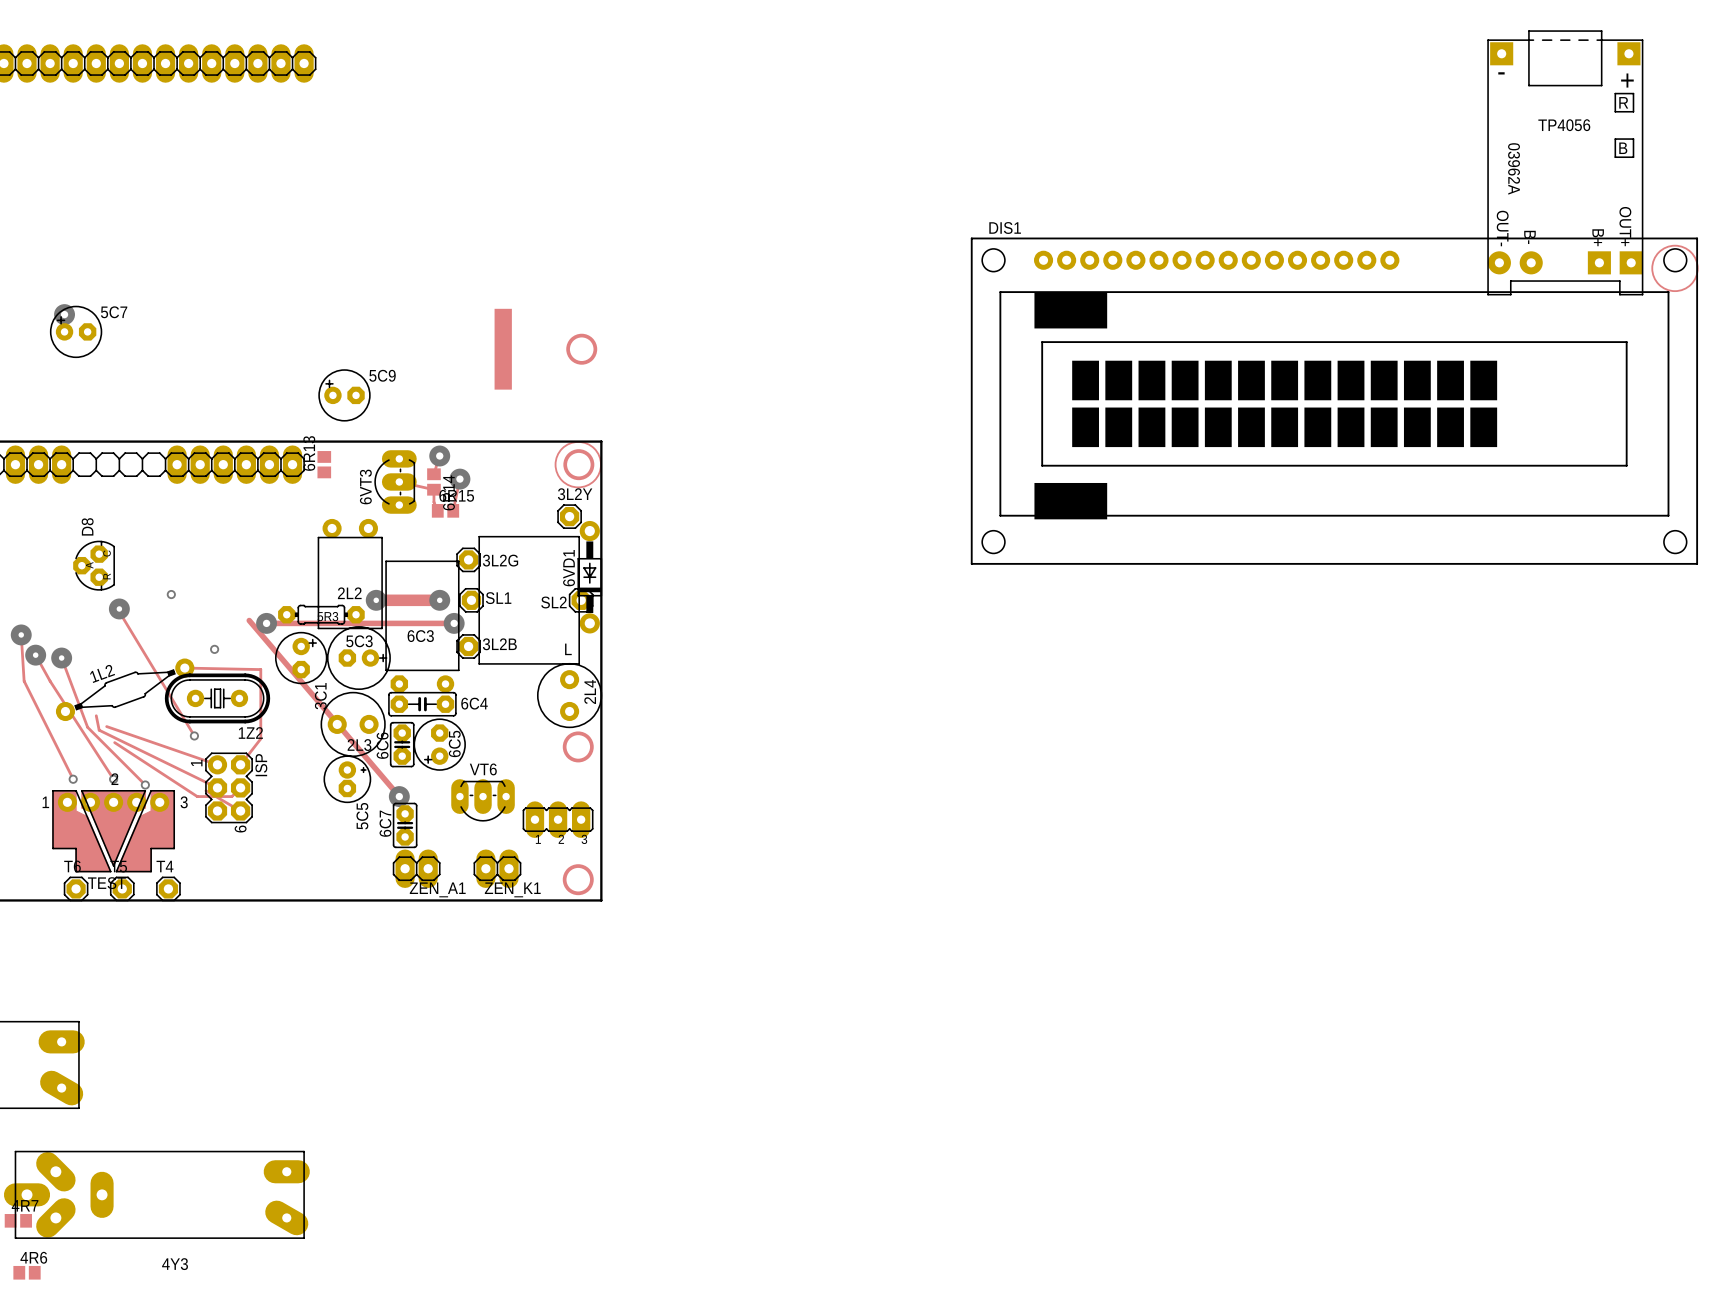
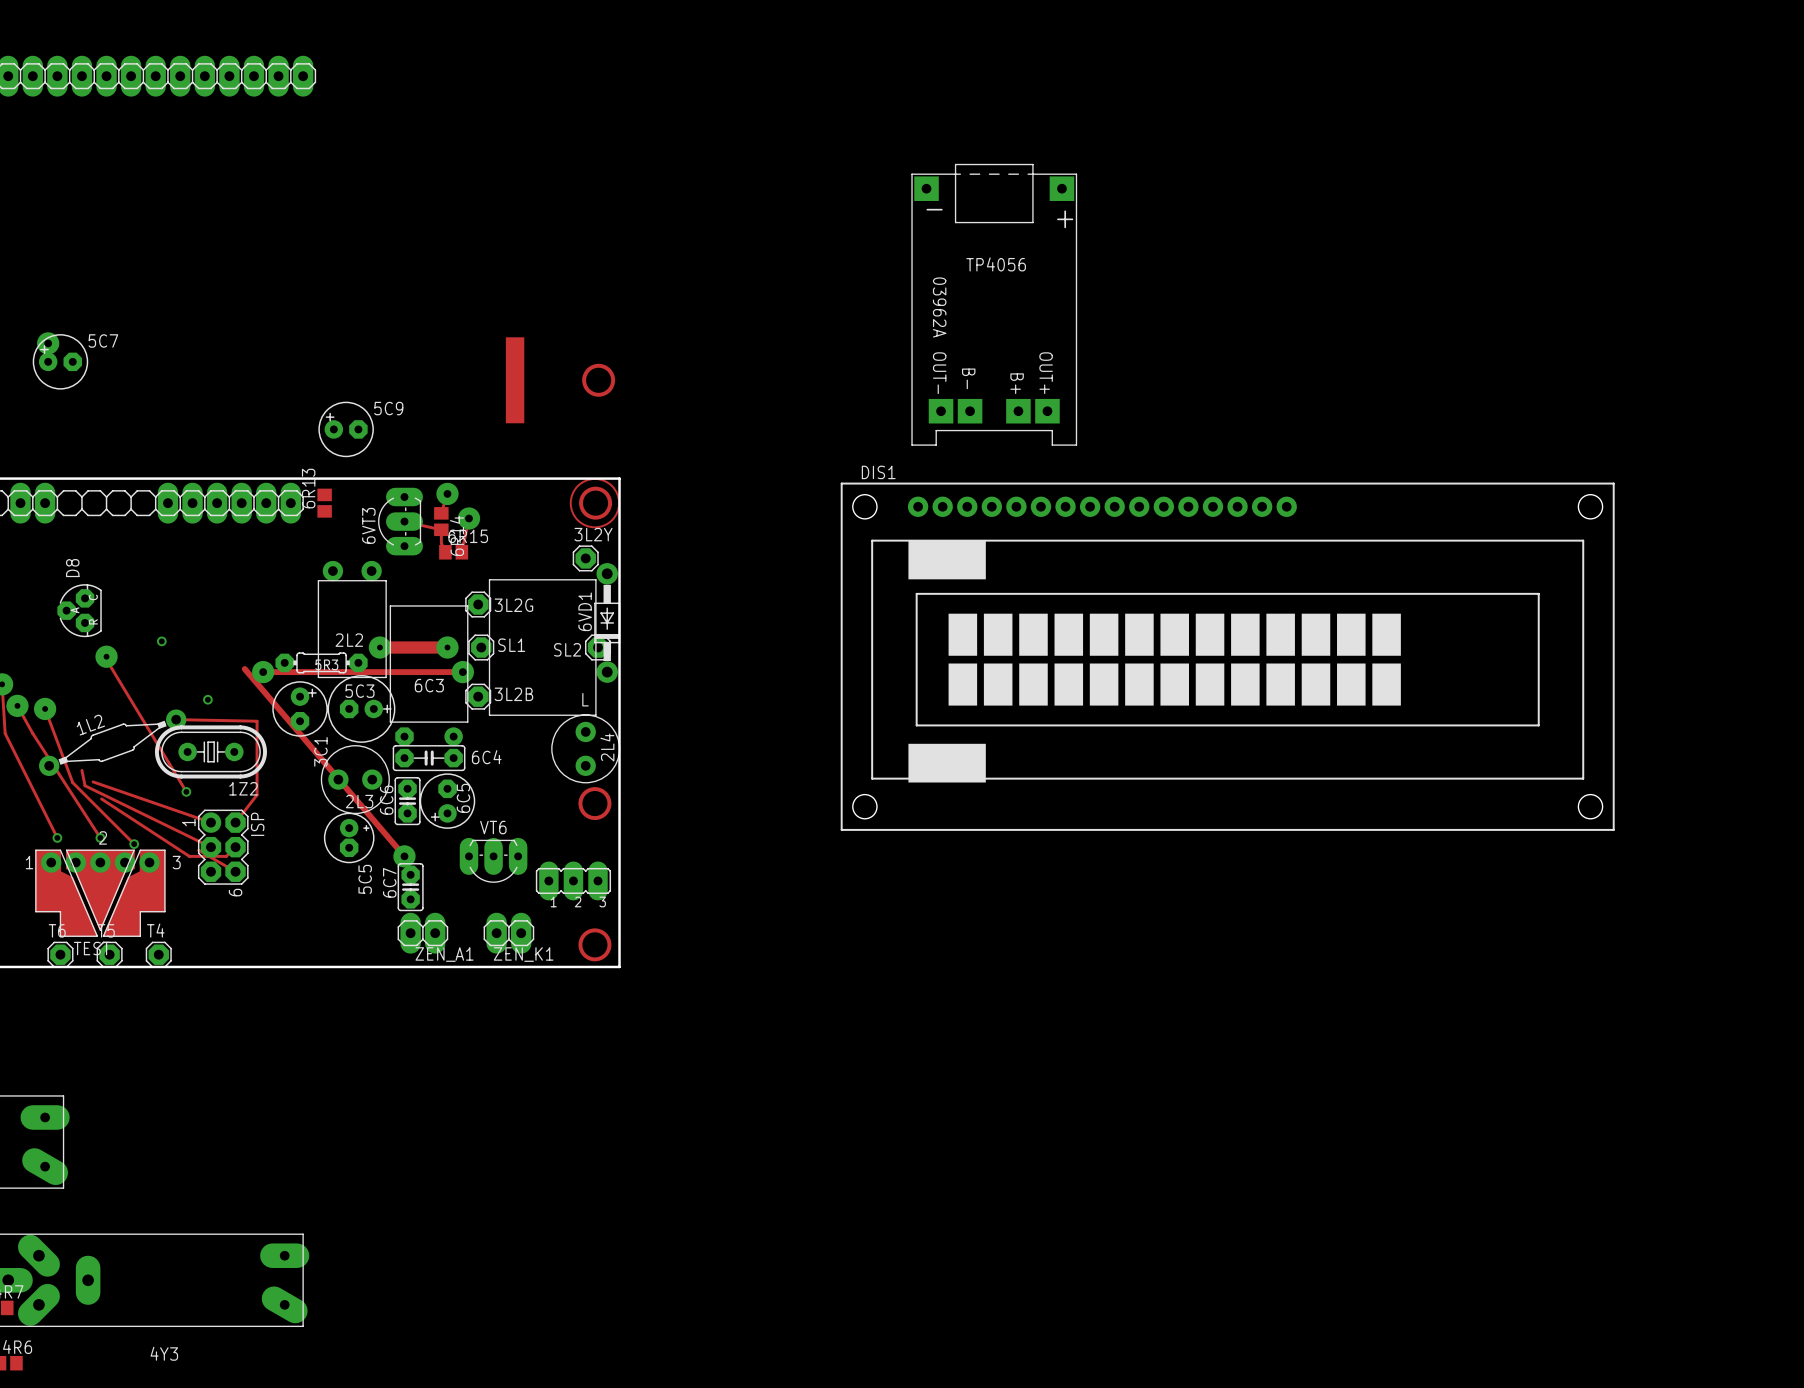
part: (1565, 162) -> none
drawing: [1651, 244, 1699, 293] -> none
part: none -> (994, 304)
DIS1 position: (1334, 401) -> (1227, 656)

